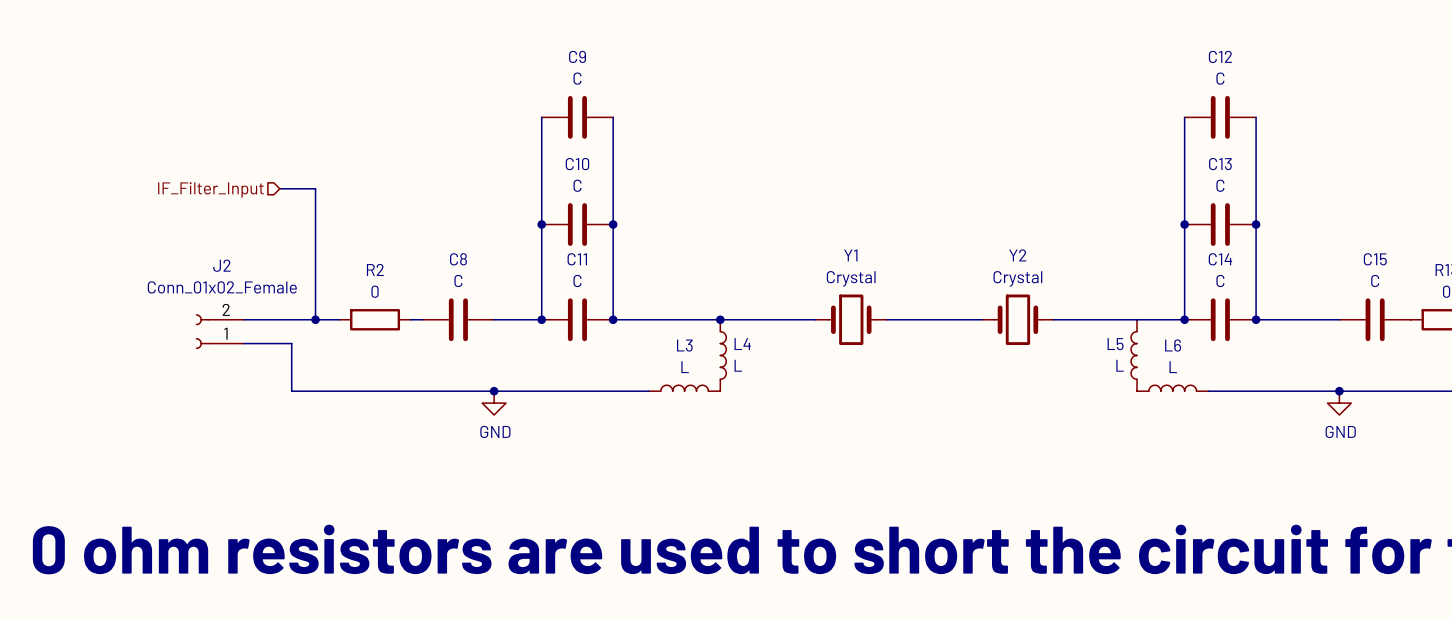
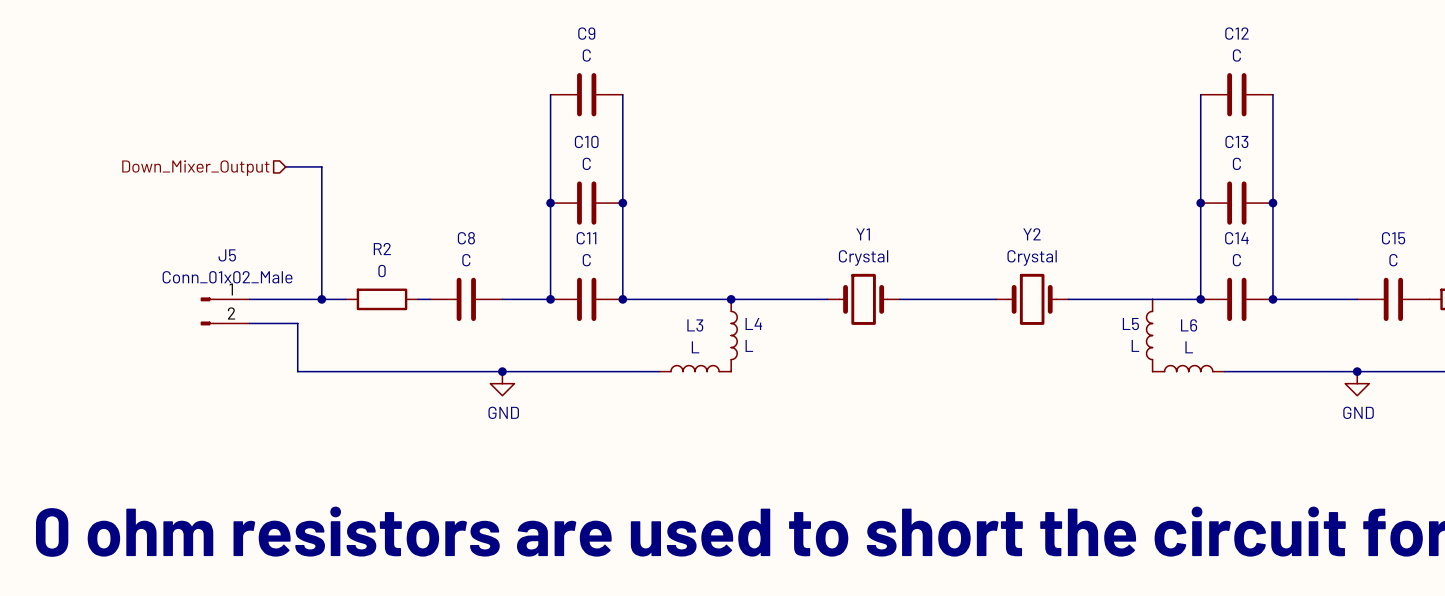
hierarchical label: IF_Filter_Input (210, 189) -> Down_Mixer_Output (195, 168)
J2: Conn_01x02_Female (219, 331) -> none
J5: none -> Conn_01x02_Male (225, 311)

